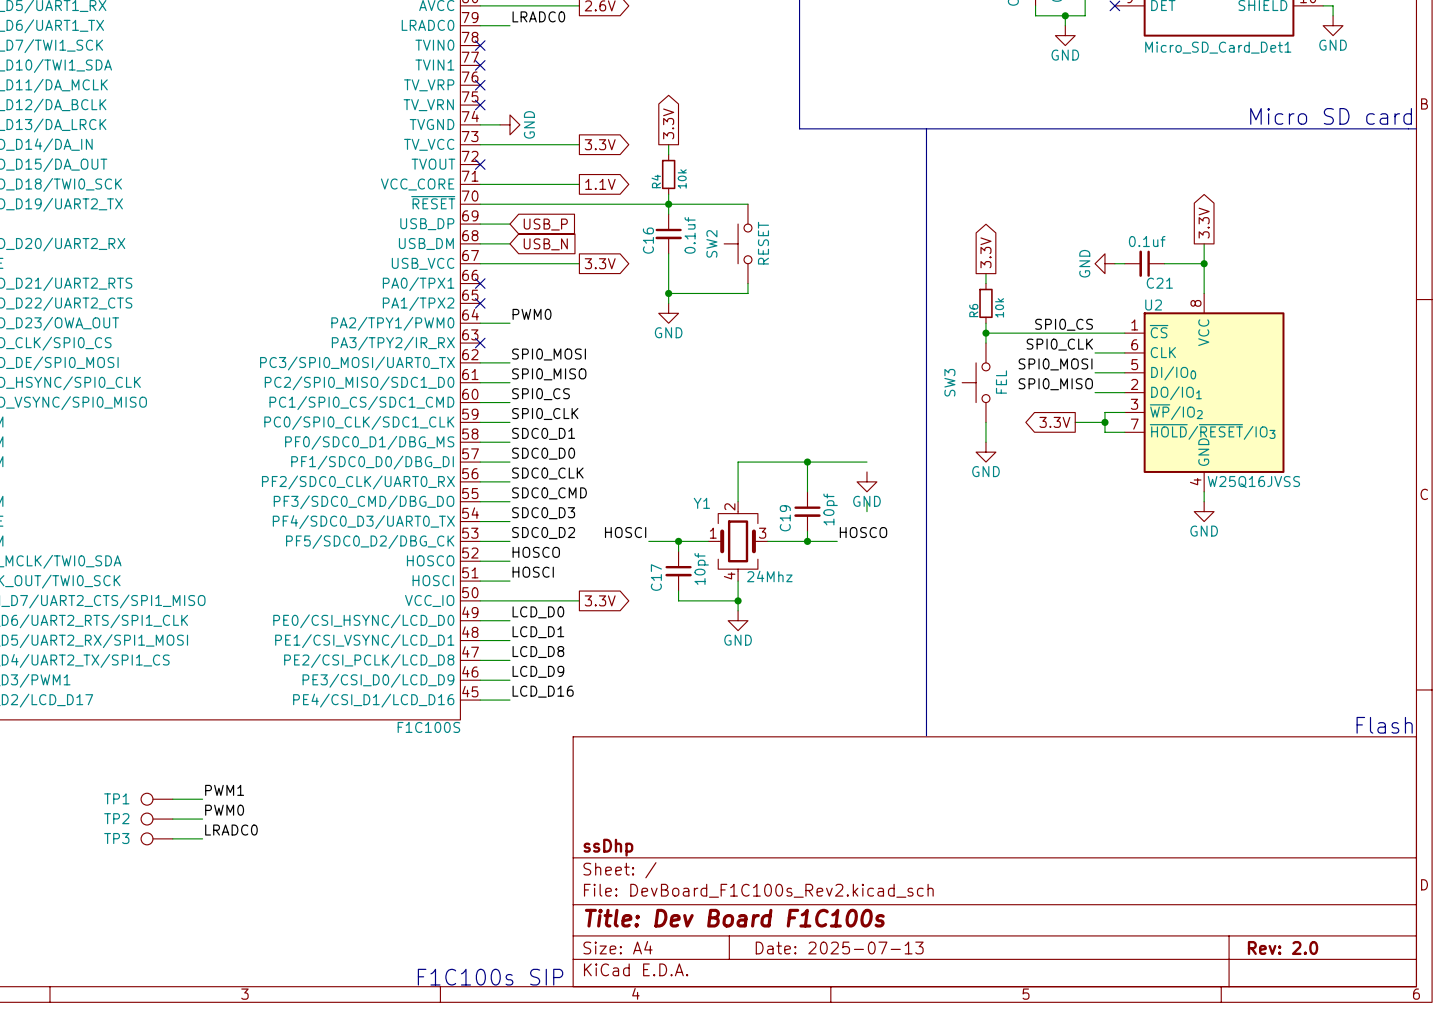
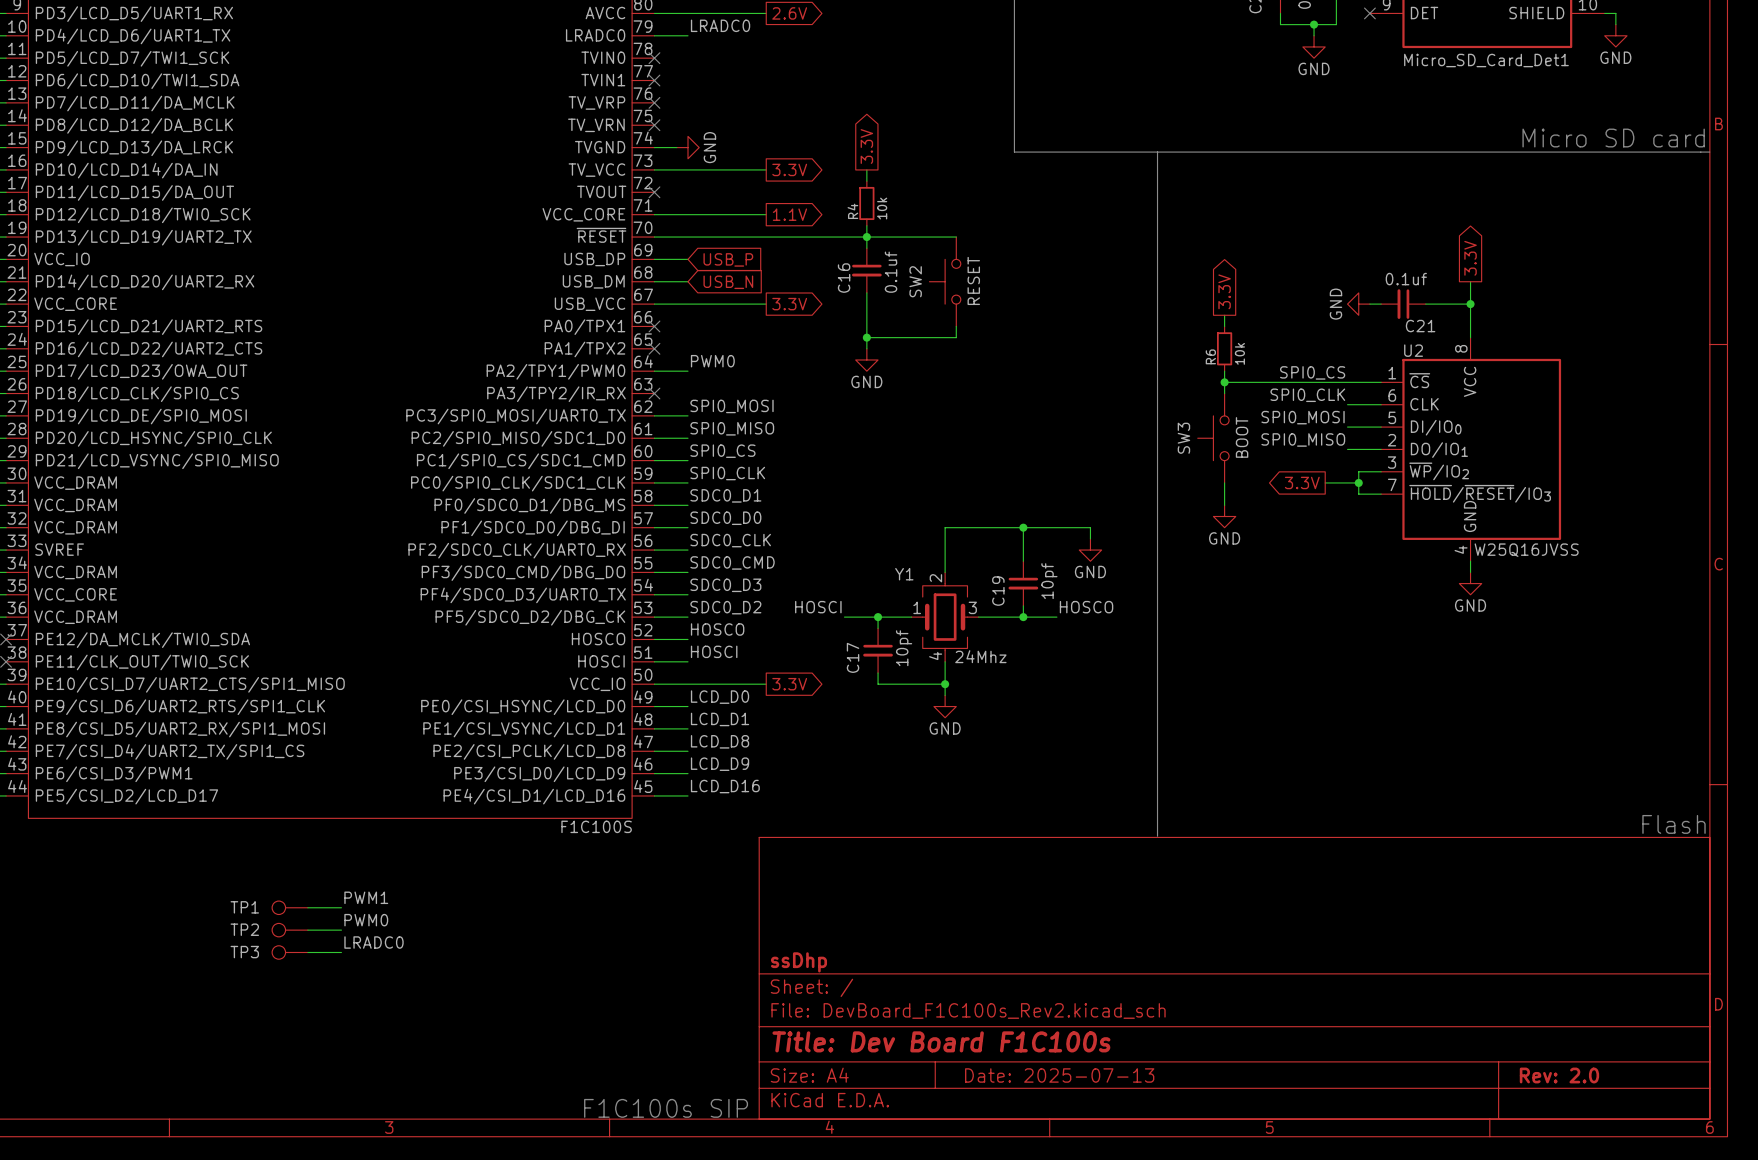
SW3 value: FEL (1001, 382) -> BOOT (1242, 437)
wire: (866, 501) (866, 511) -> (1090, 527) (1090, 538)

